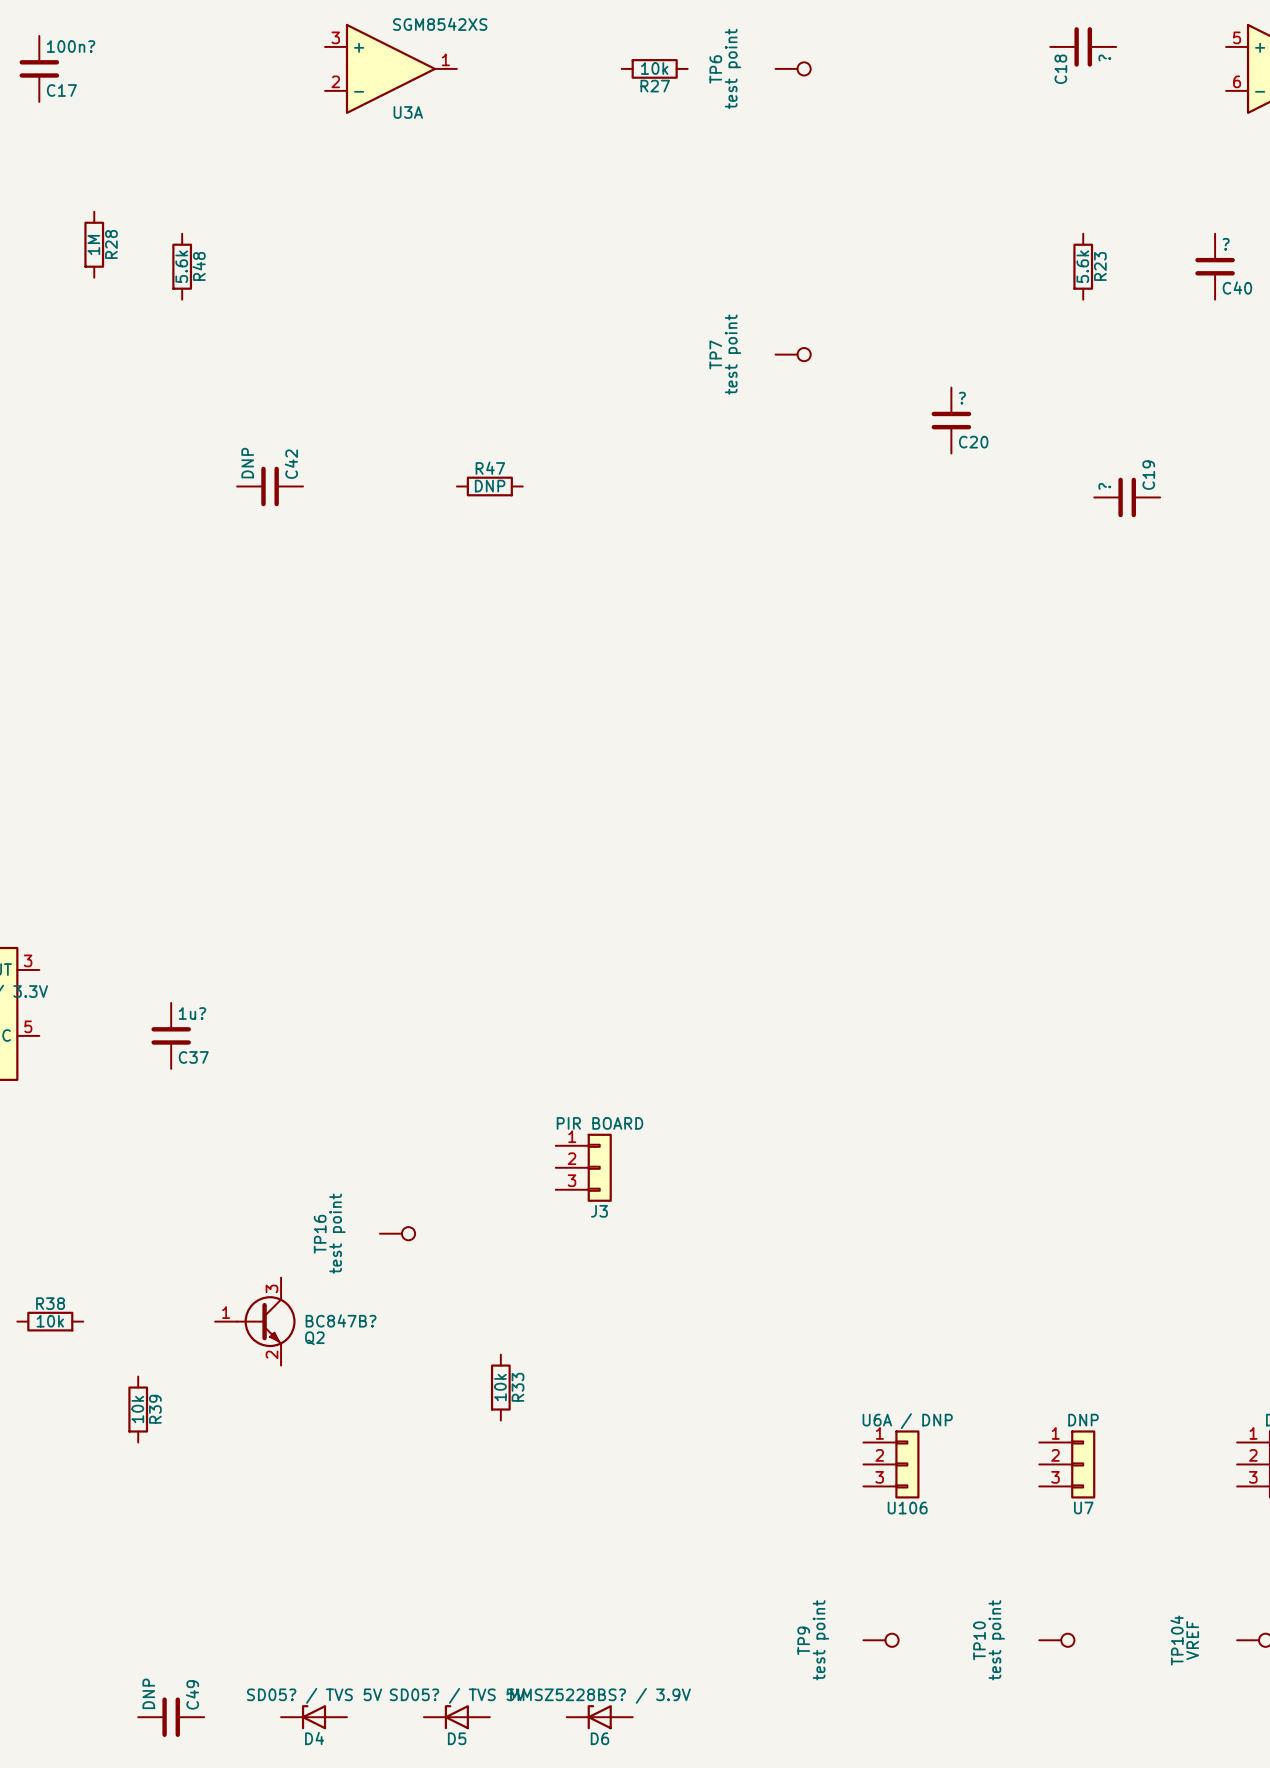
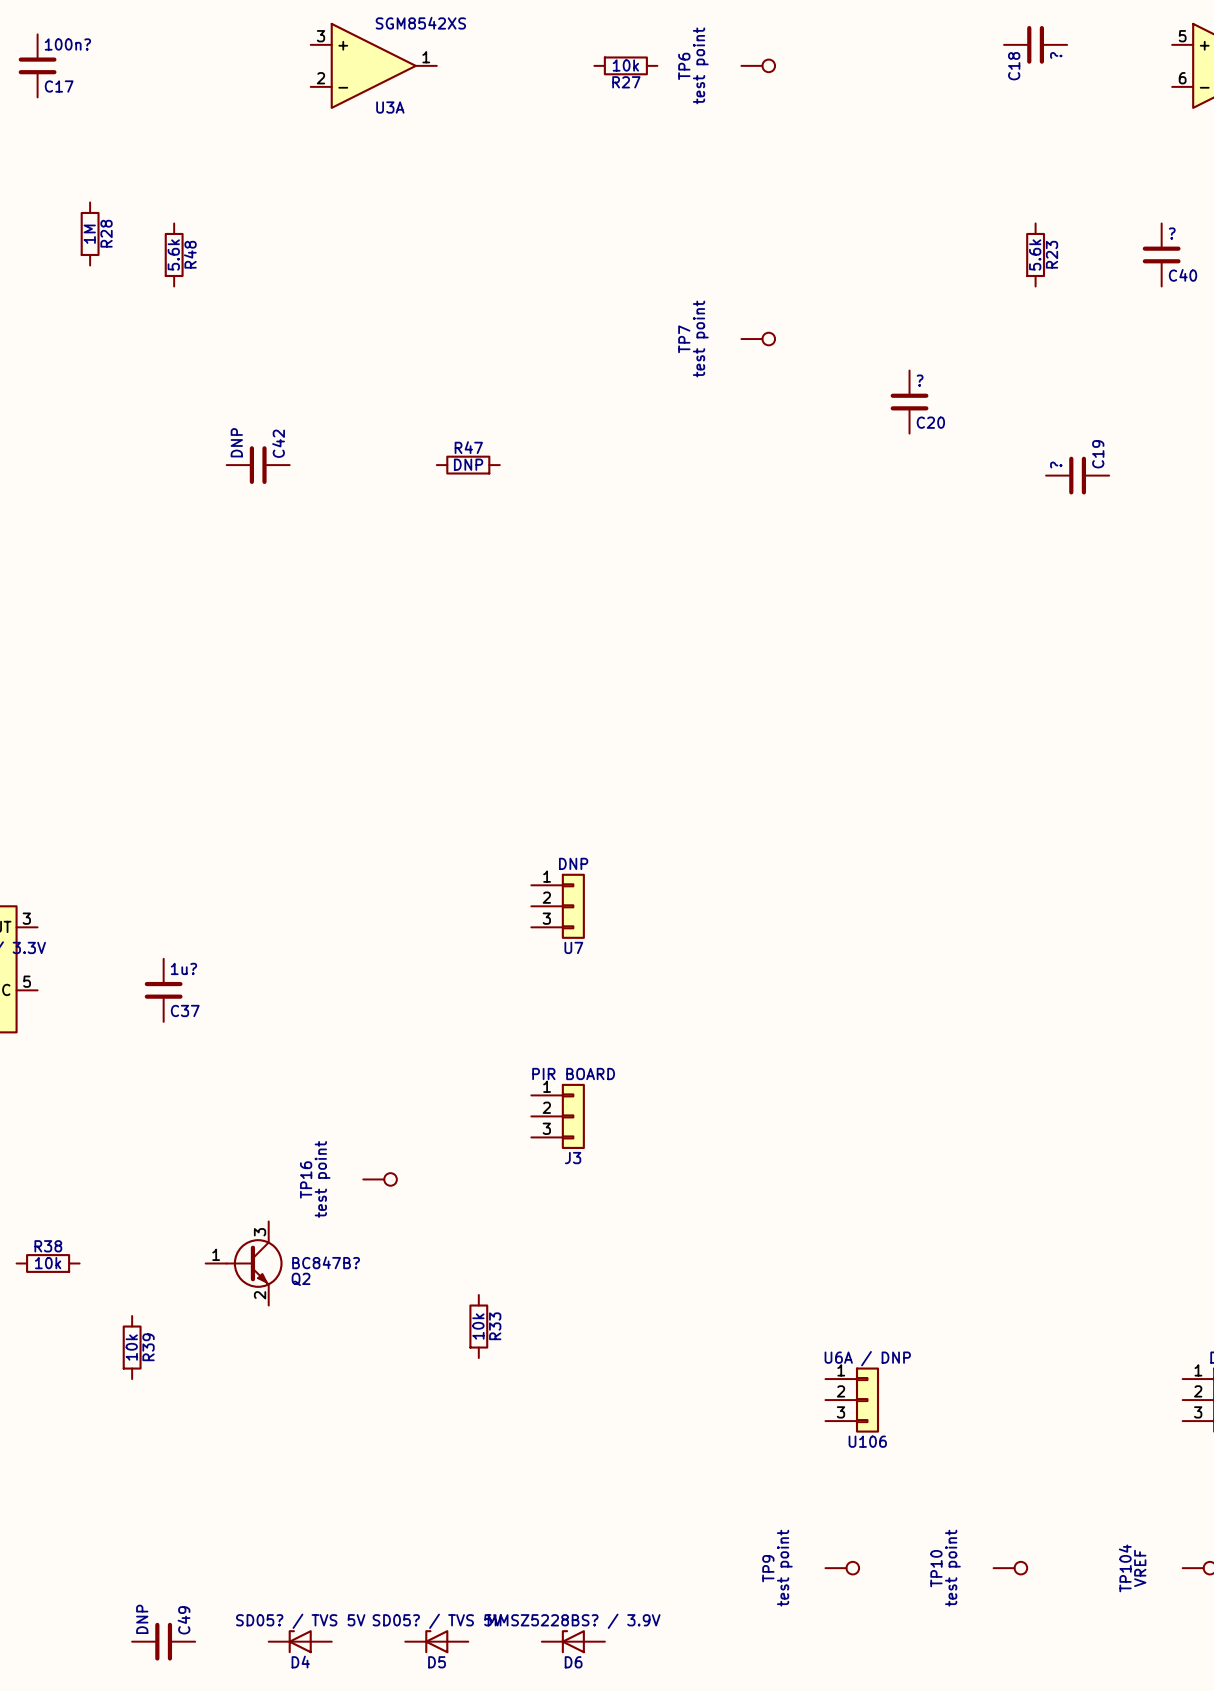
U7 position: (1067, 1464) -> (558, 906)

